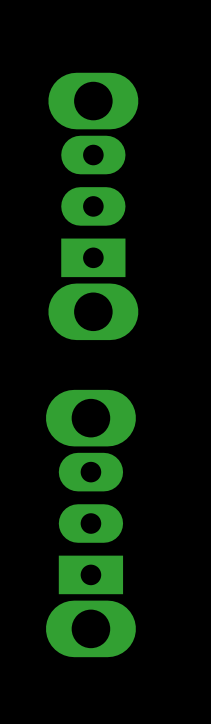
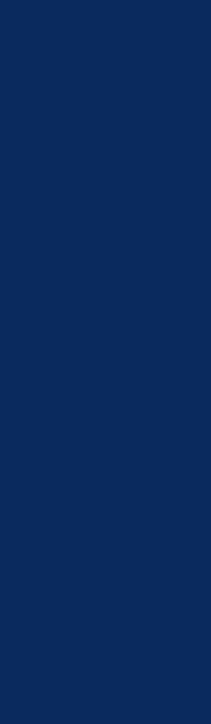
part: (93, 206) -> none
part: (90, 523) -> none

